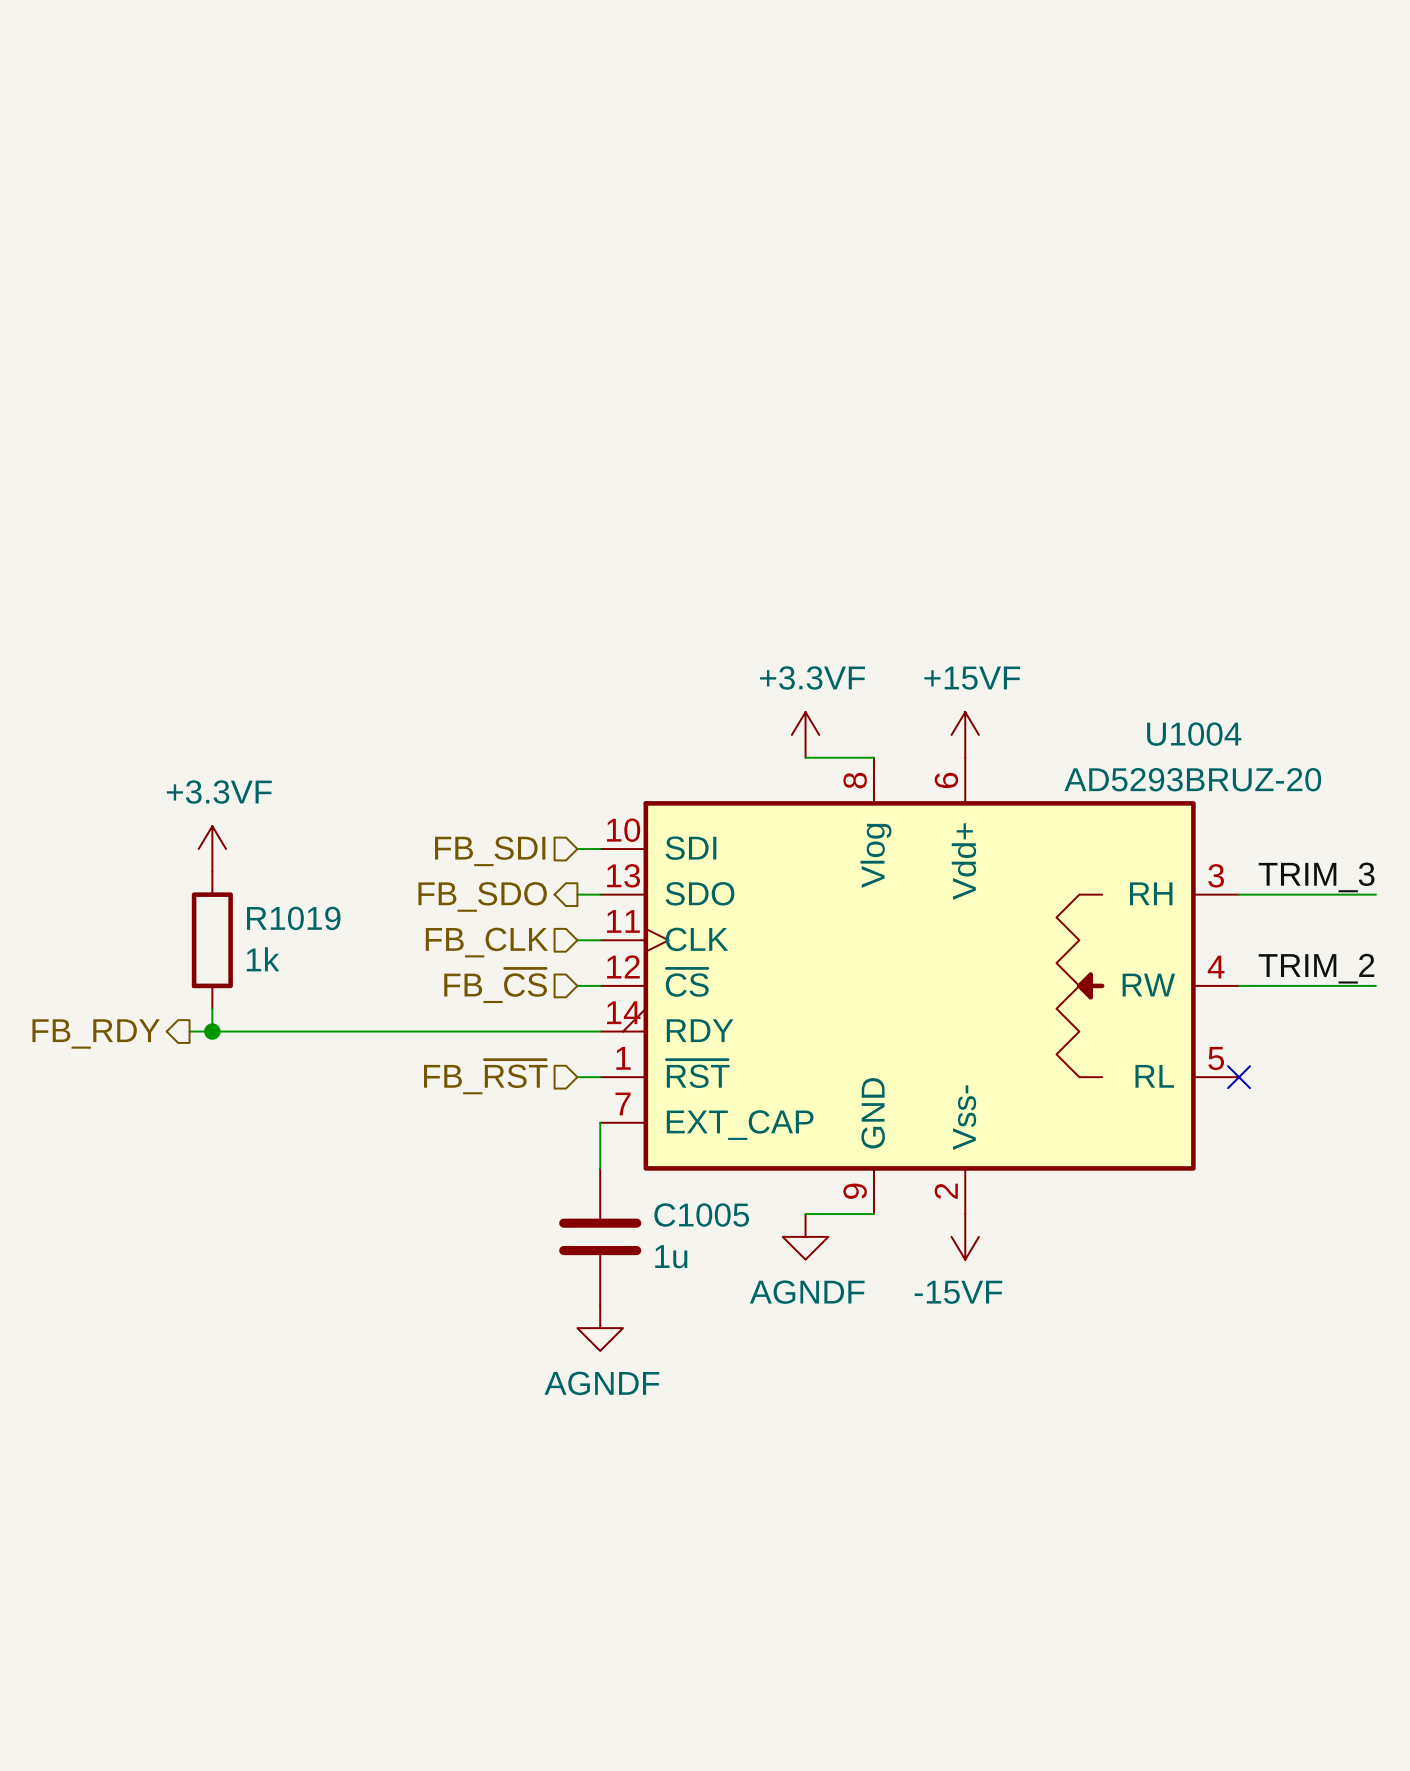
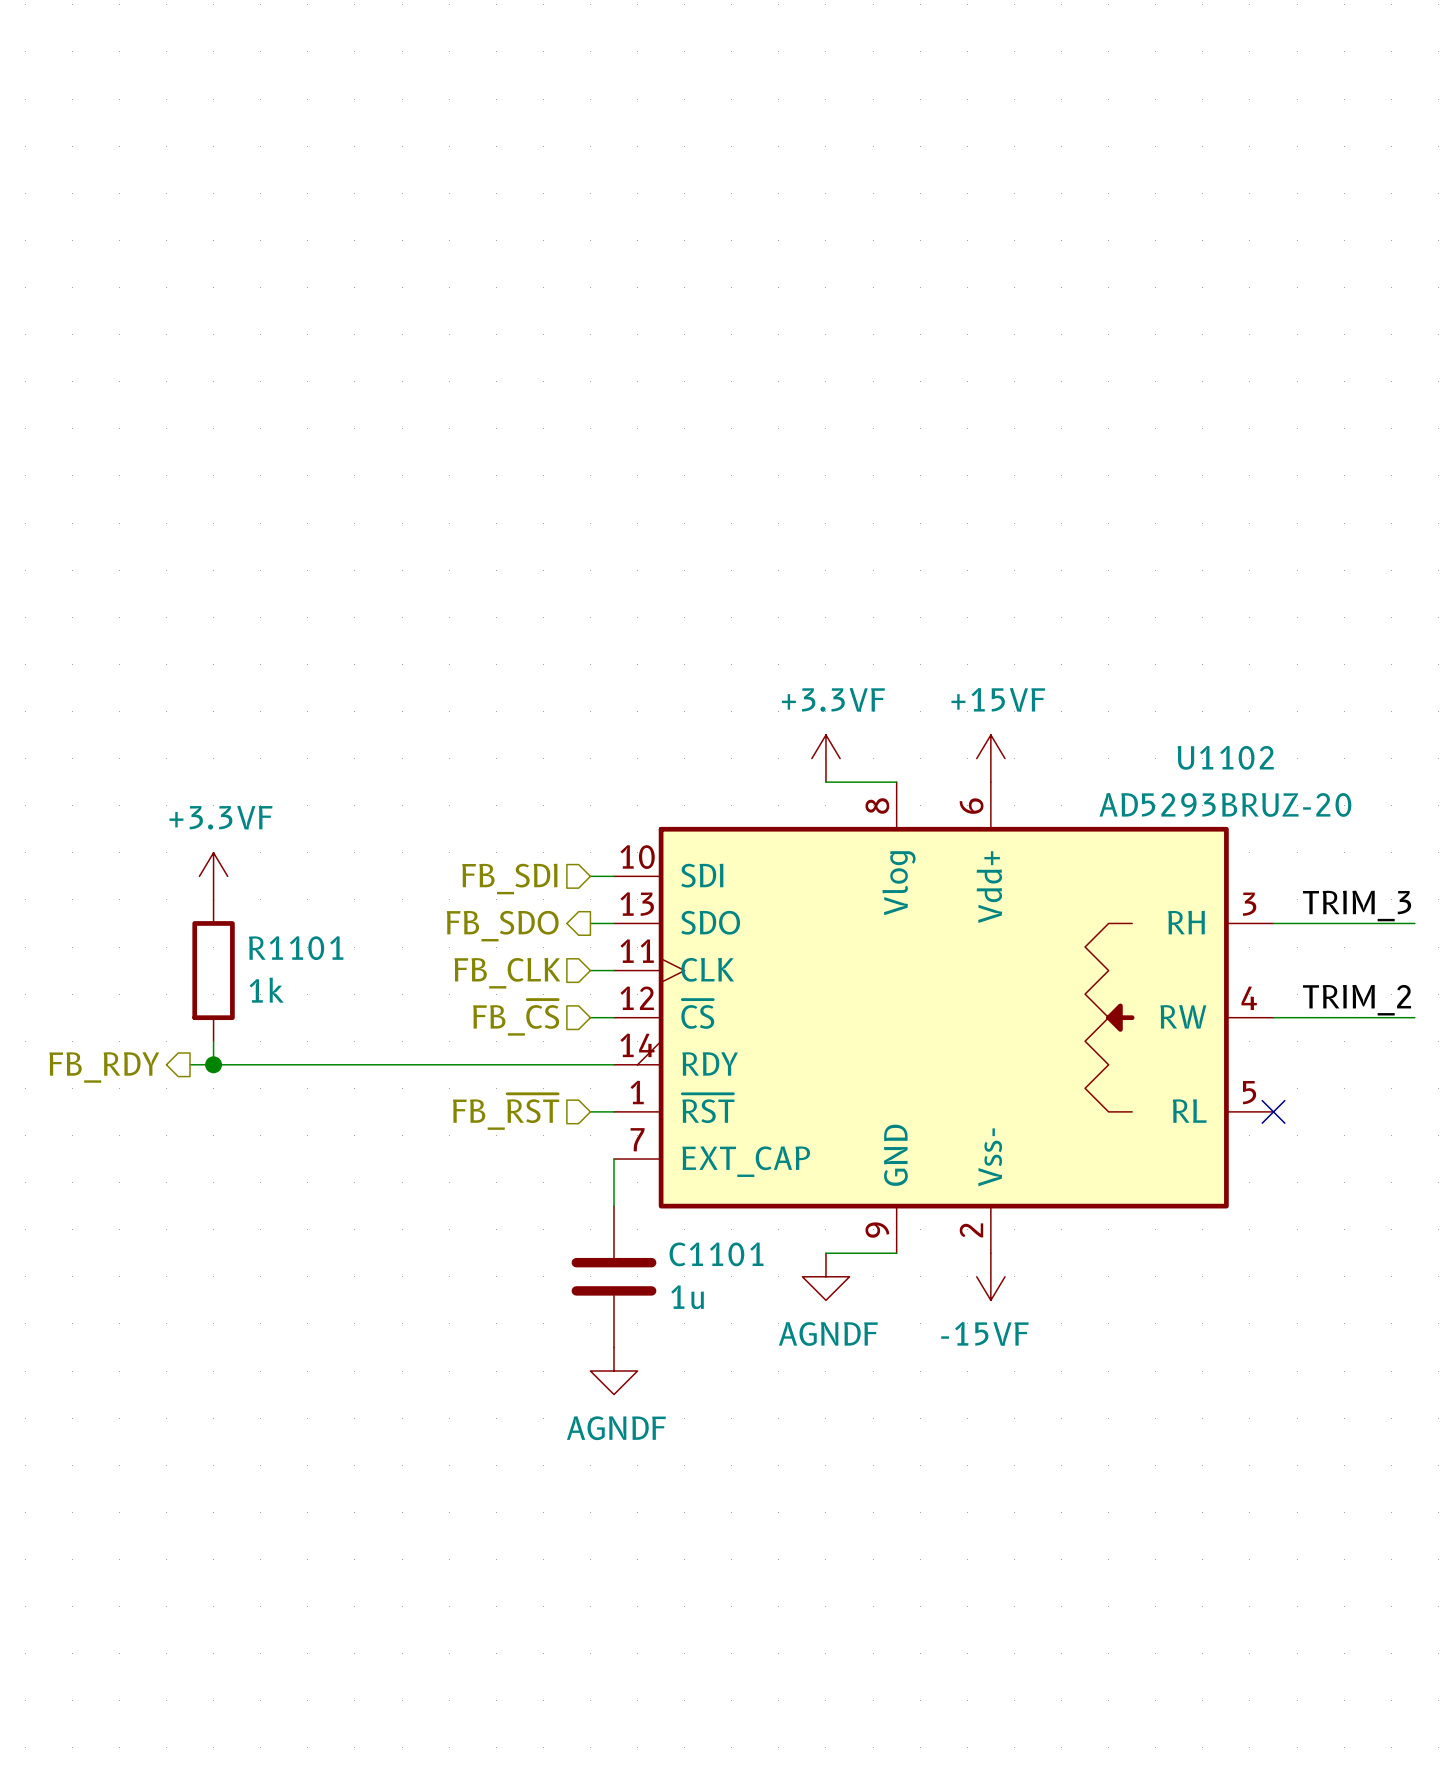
U1004 name: U1004 (1194, 734) -> U1102 (1225, 757)
R1019 name: R1019 (293, 918) -> R1101 (296, 948)
C1005 name: C1005 (701, 1215) -> C1101 (716, 1254)

